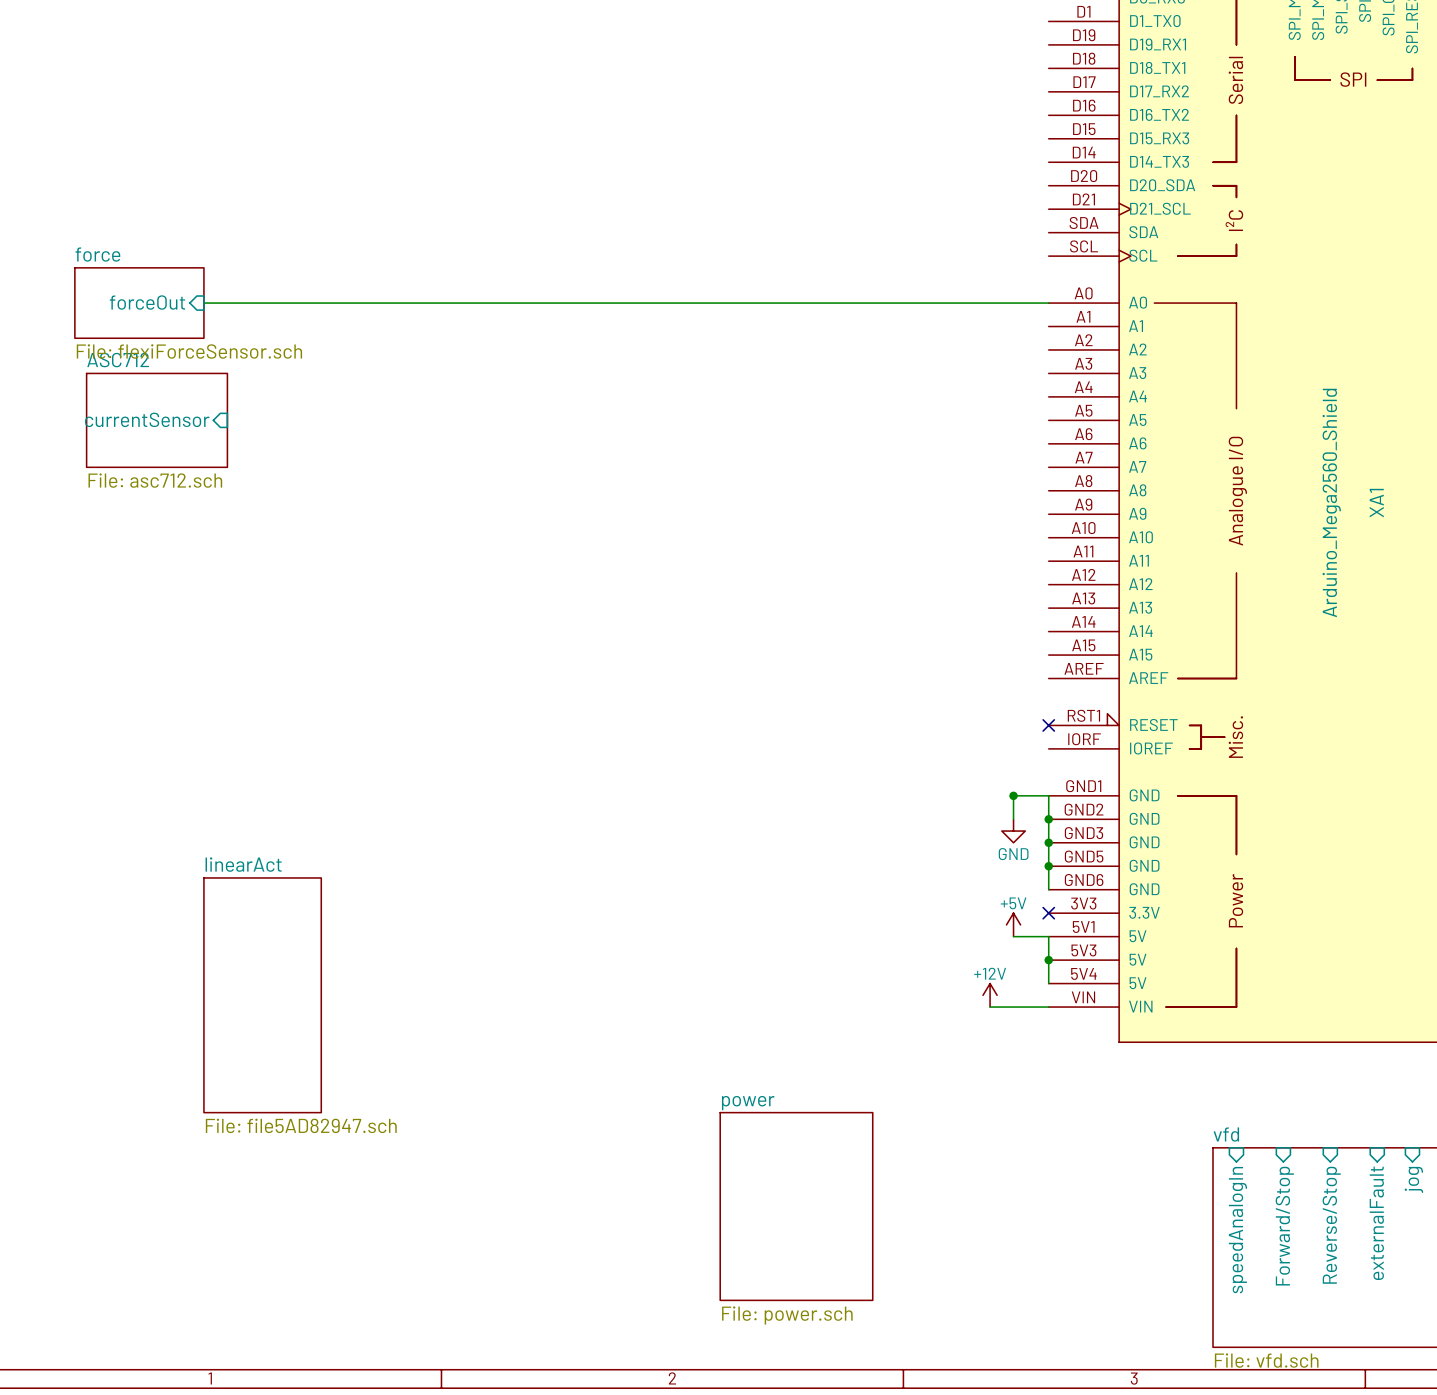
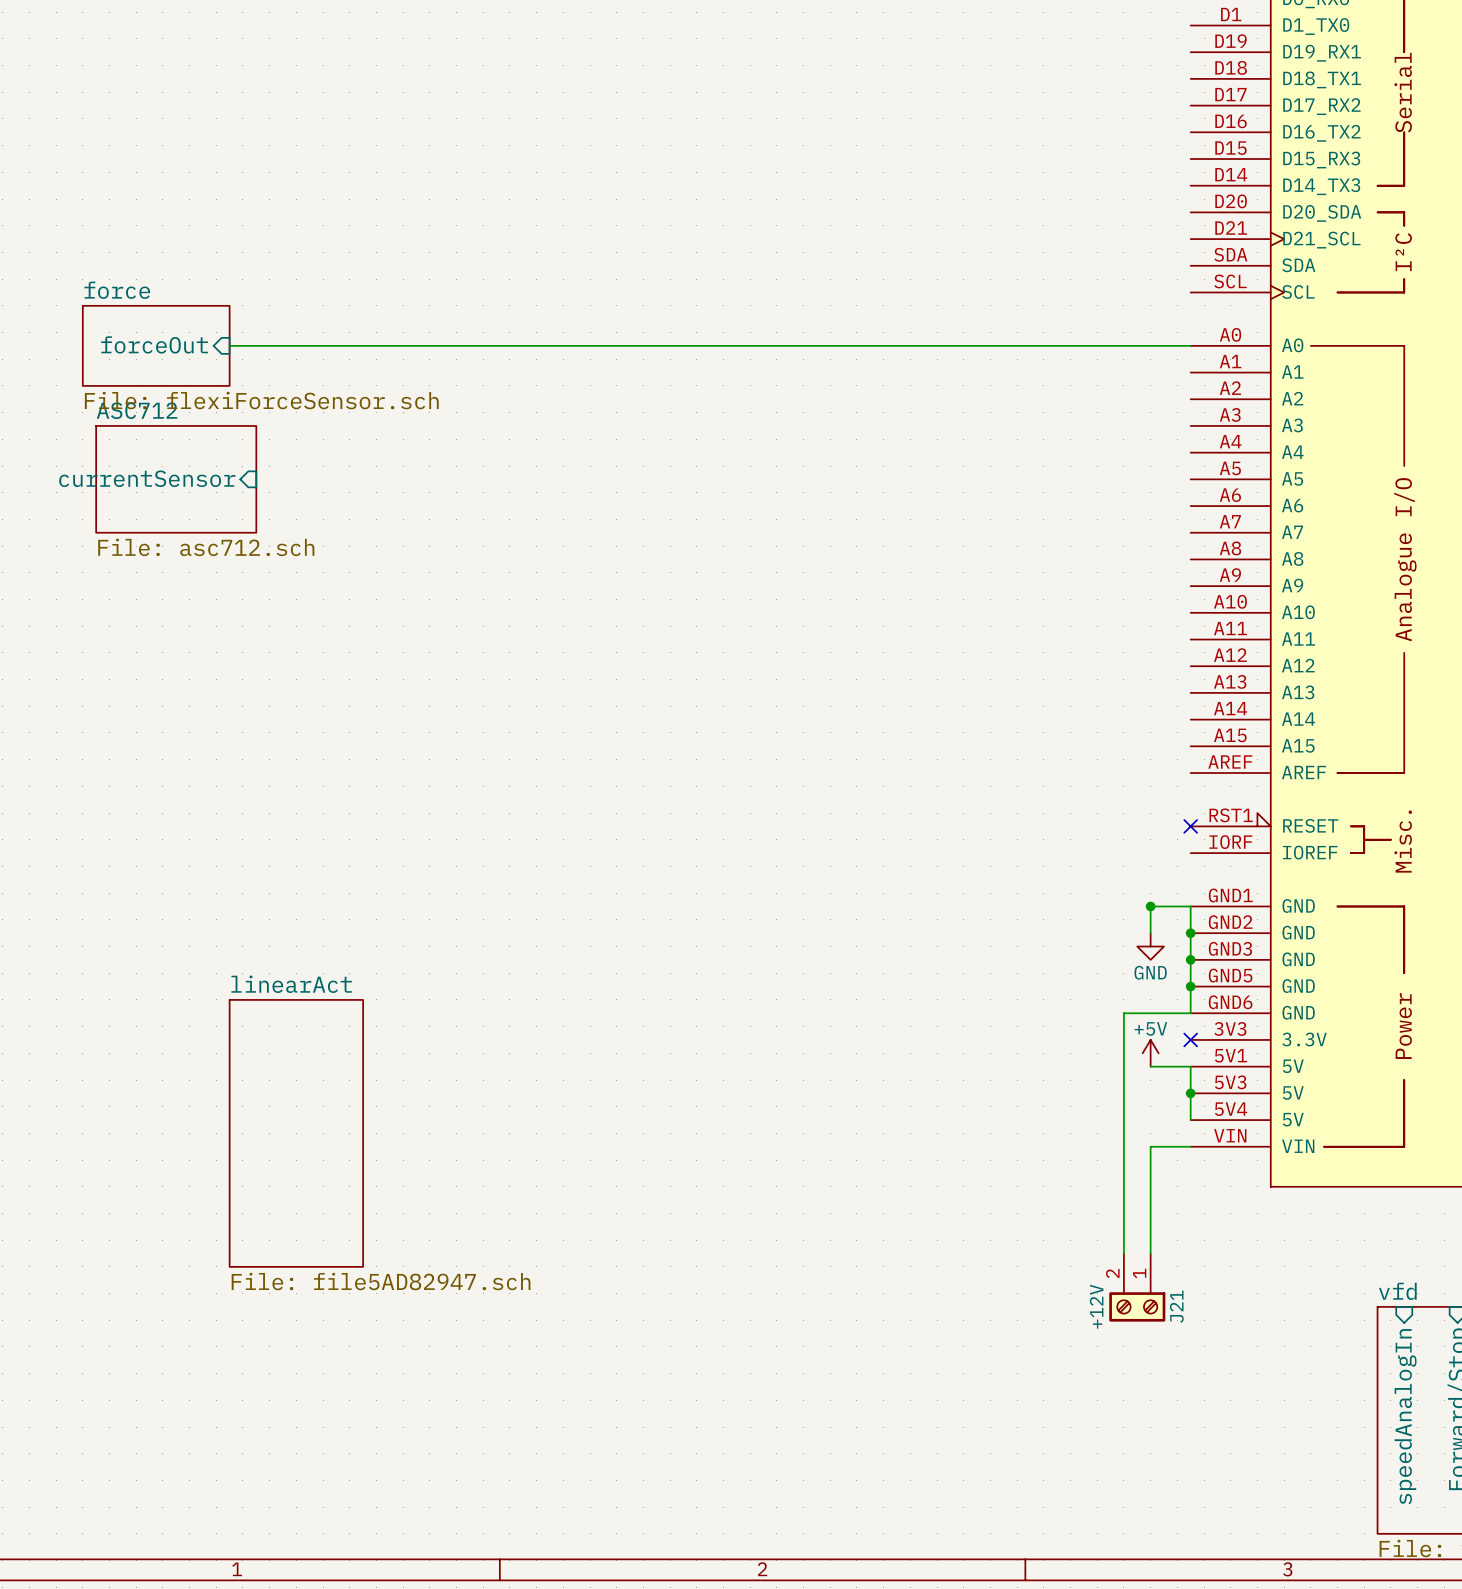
wire: none -> (1190, 1013) (1123, 1013) (1123, 1253)
power symbol: +12V (990, 995) -> none
wire: (990, 1007) (1013, 1007) -> (1150, 1253) (1150, 1146)
J21: none -> +12V (1137, 1287)
sheet power: File: power.sch (796, 1206) -> none

